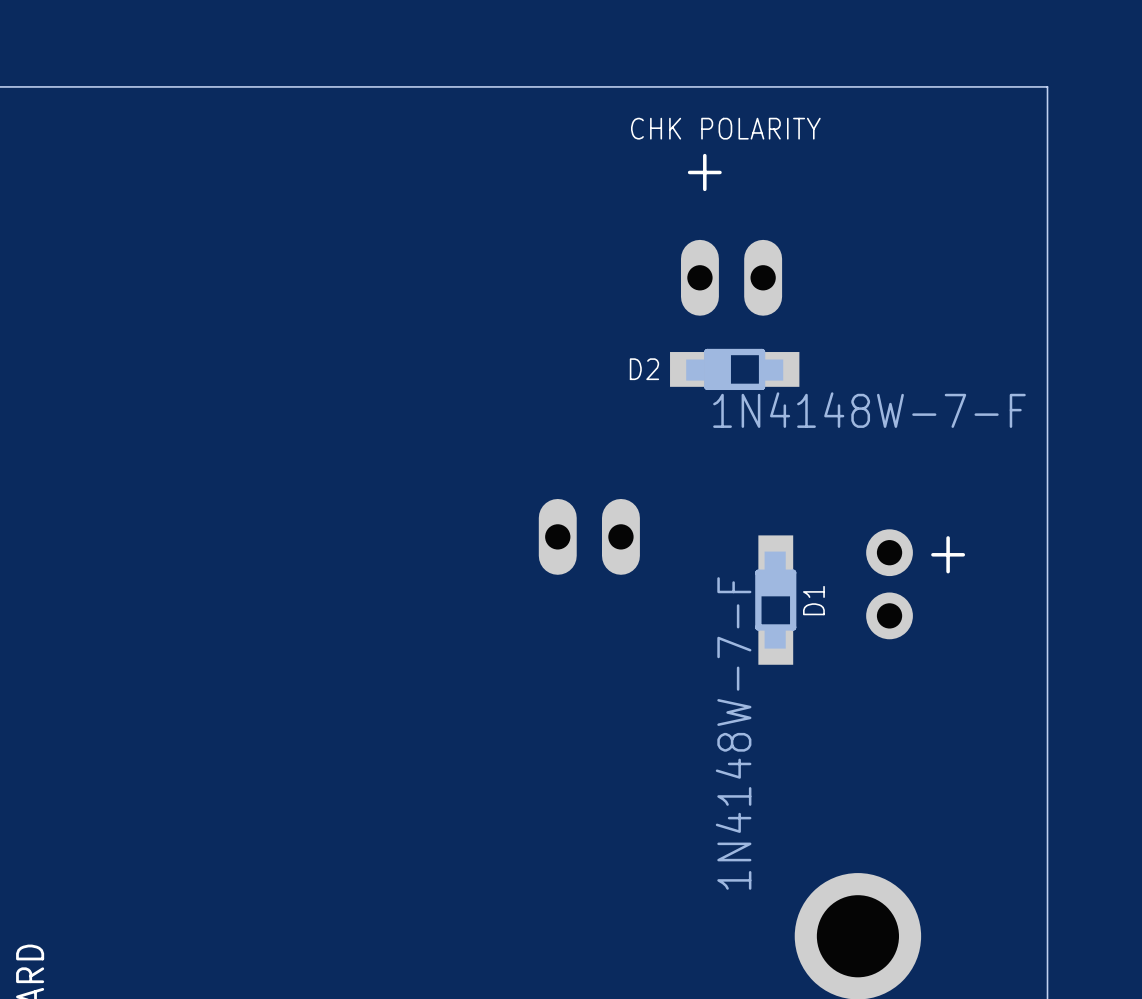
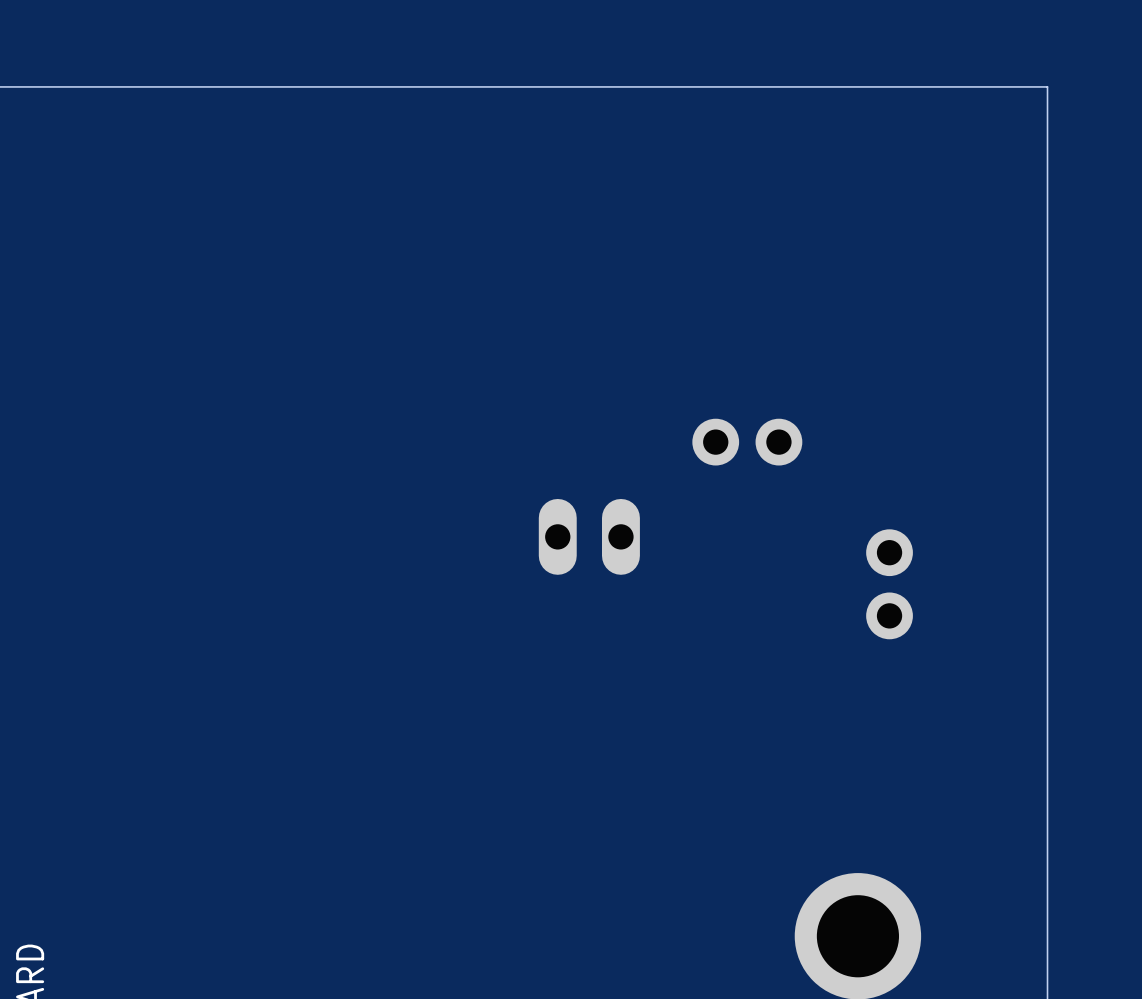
text: CHK POLARITY (725, 128) -> none
text: + (704, 172) -> none
part: (731, 277) -> none
D2: 1N4148W-7-F (734, 369) -> none
part: none -> (747, 442)
text: + (948, 554) -> none
D1: 1N4148W-7-F (775, 600) -> none

